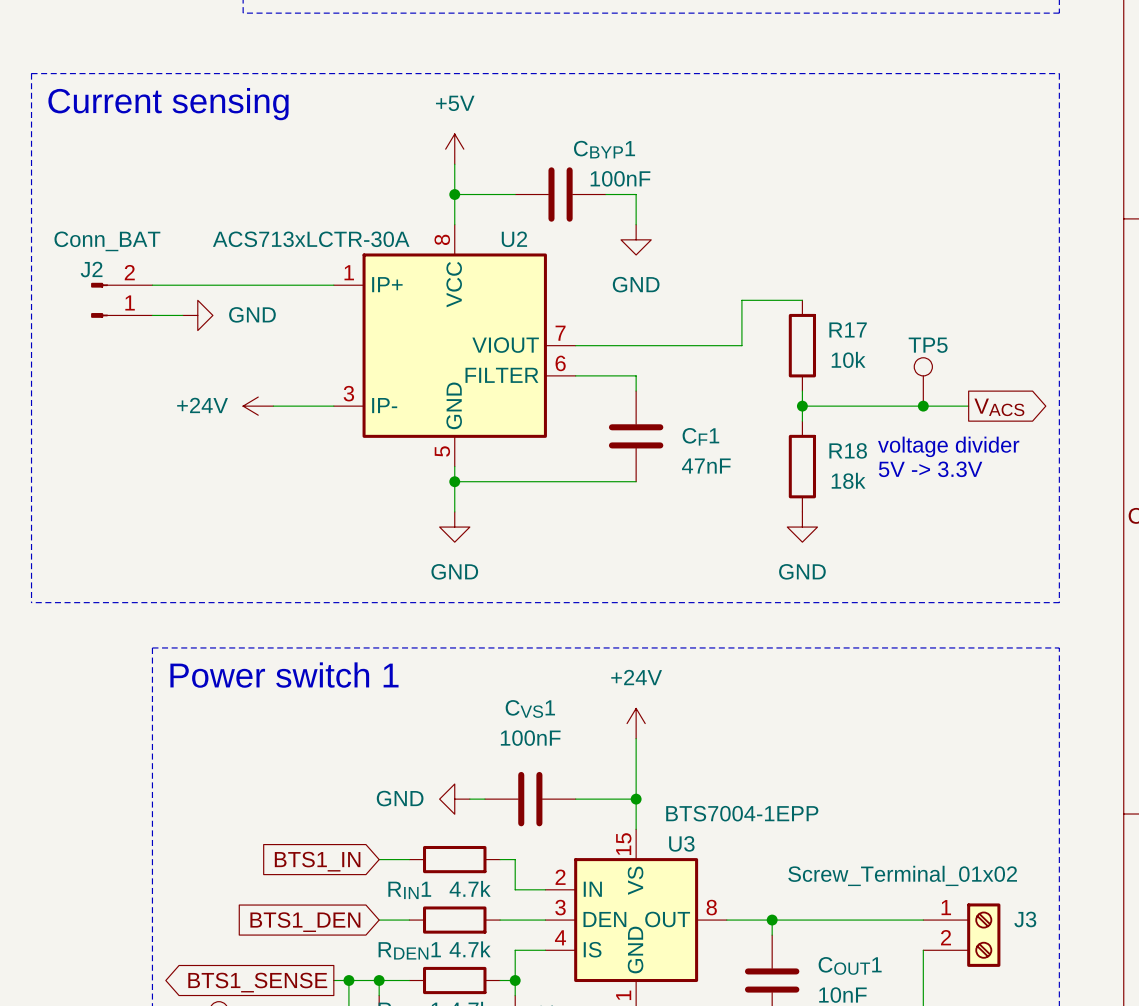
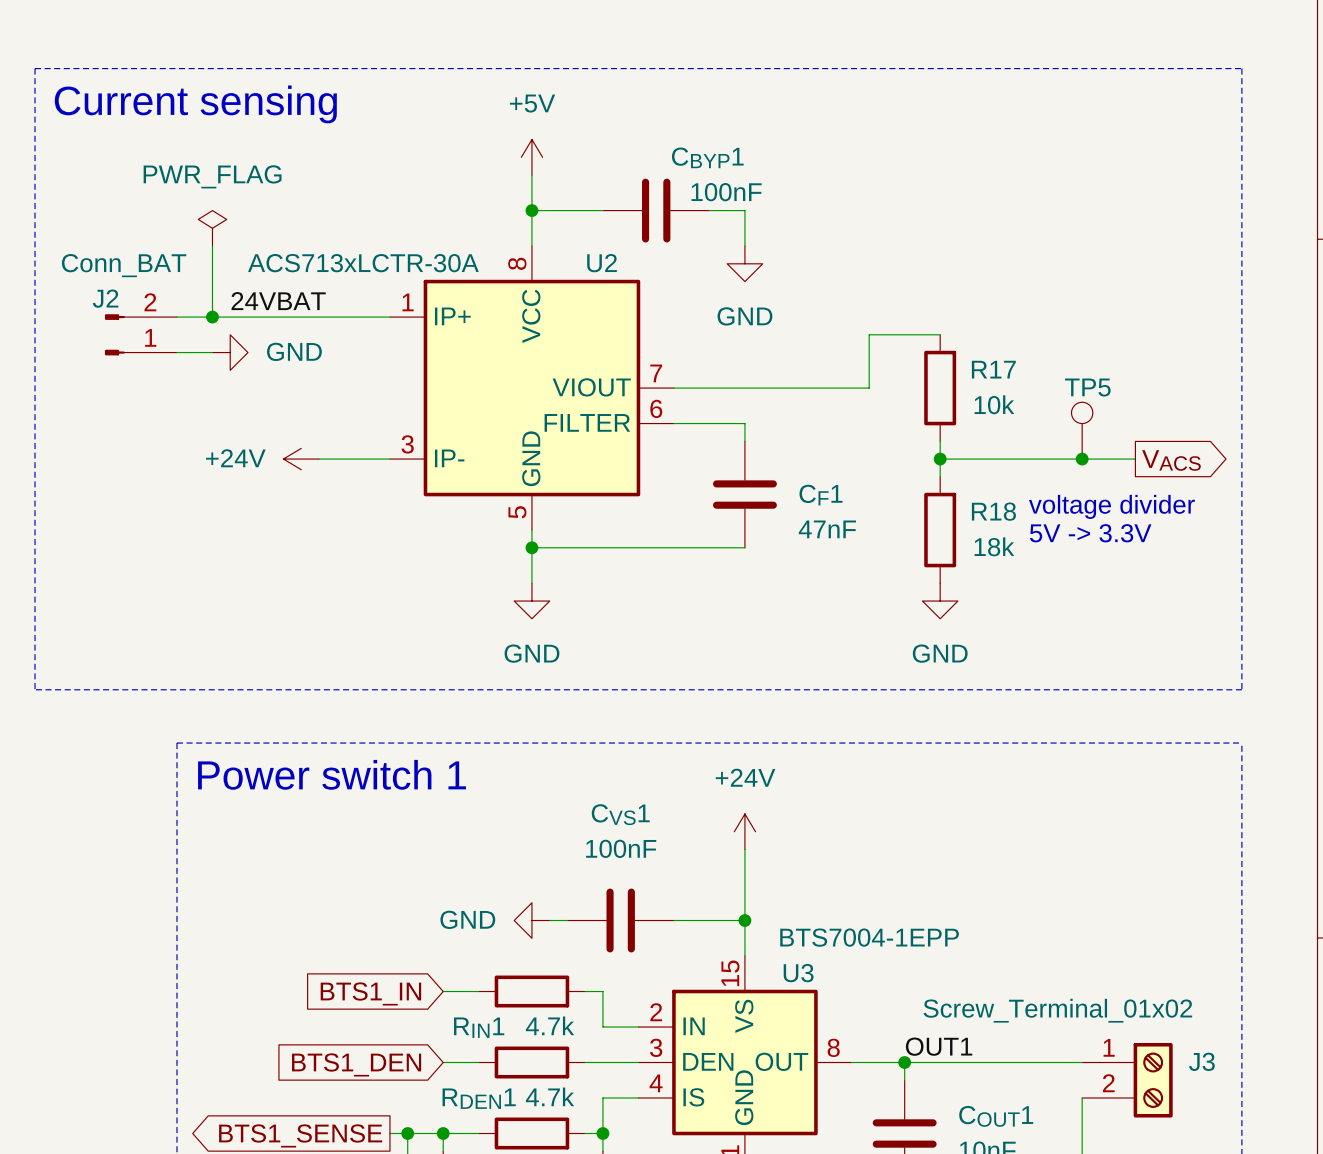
power symbol: none -> PWR_FLAG (212, 228)
wire: none -> (212, 246) (212, 317)
label: none -> 24VBAT (278, 301)
junction: none -> (212, 317)
label: none -> OUT1 (939, 1046)

